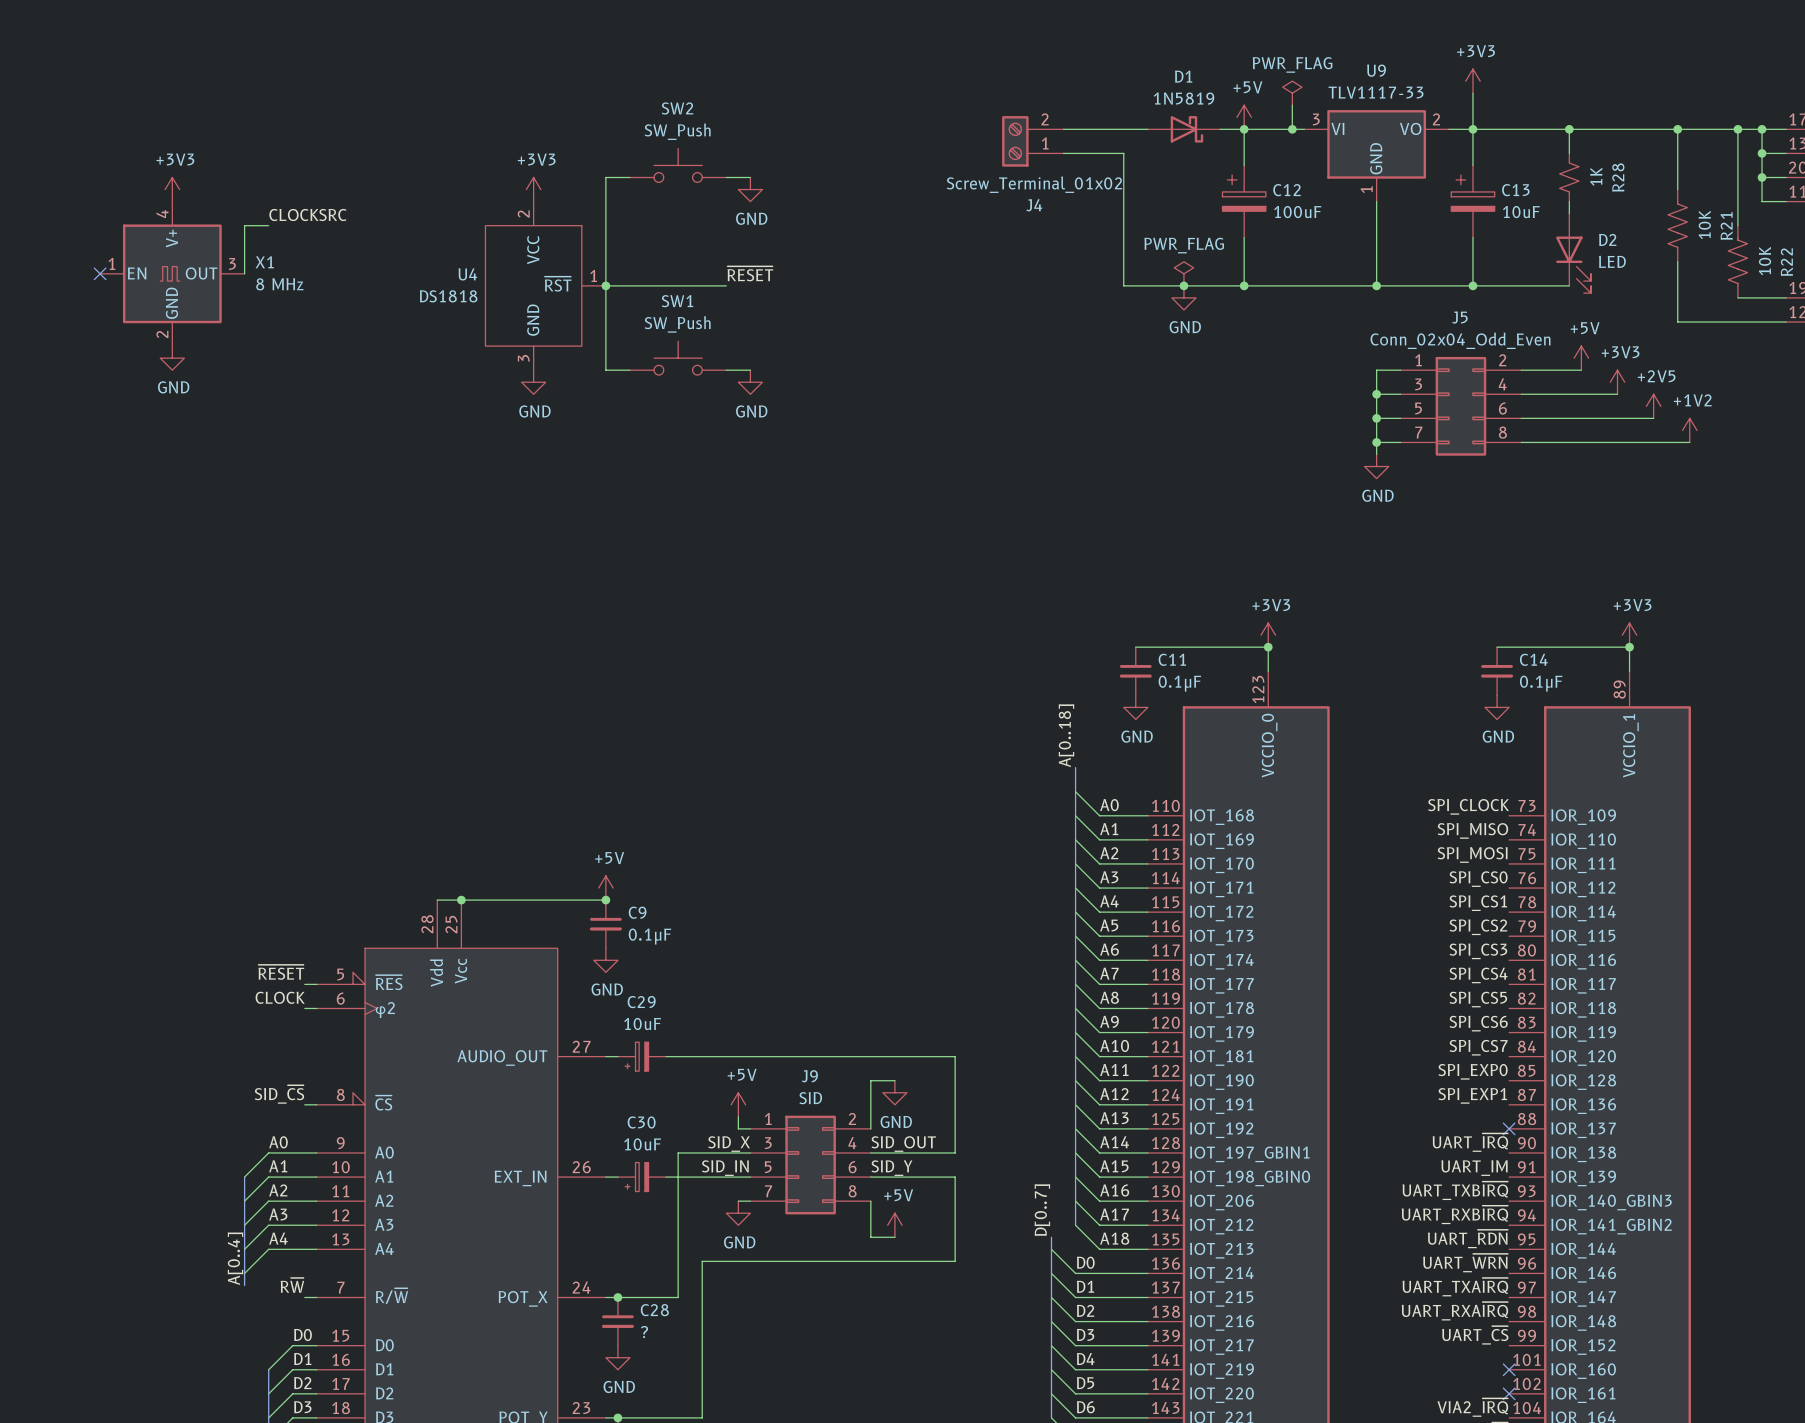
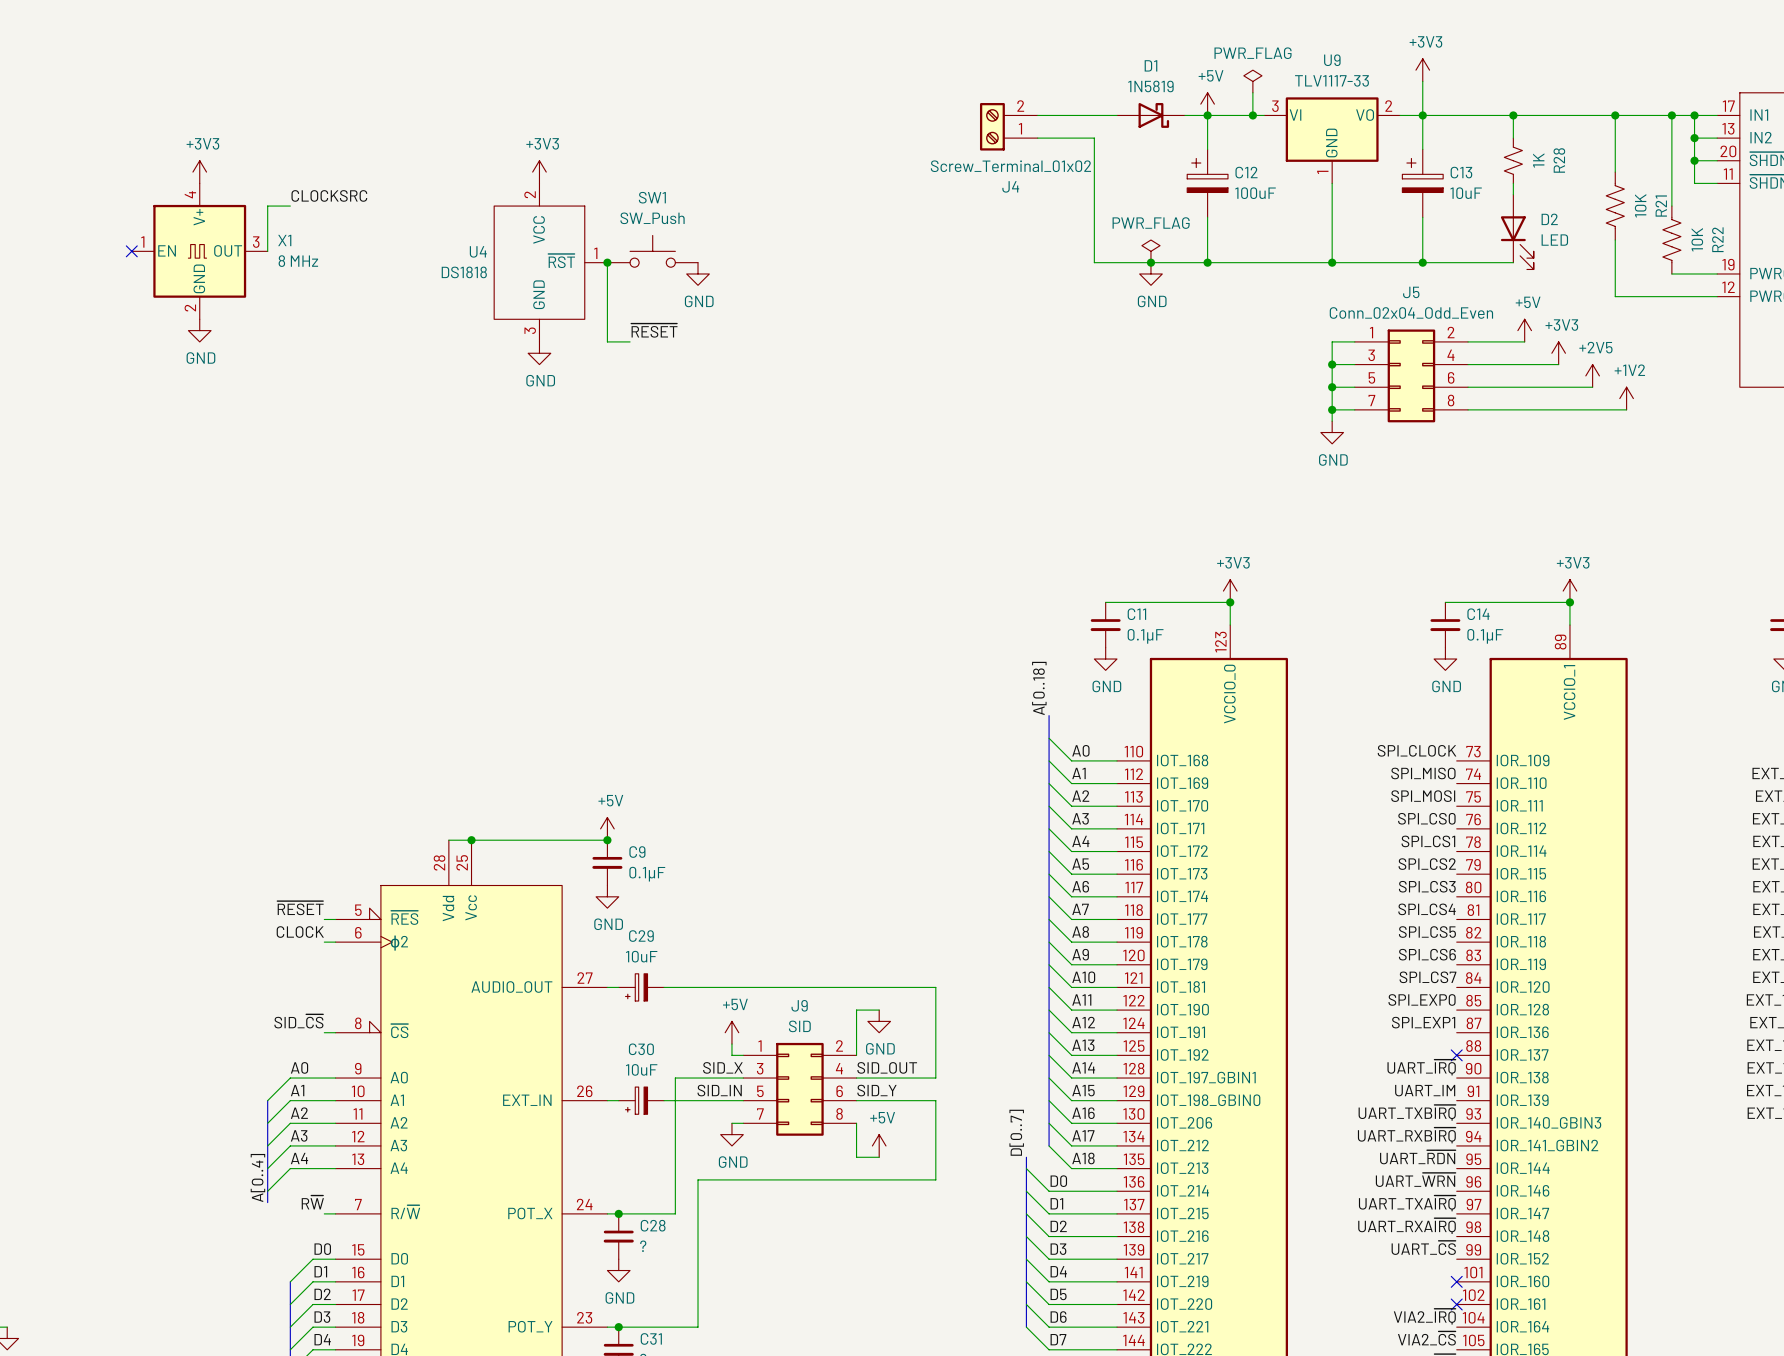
SW2: SW_Push (678, 165) -> none
wire: (629, 177) (605, 177) (605, 285) (726, 285) -> none
wire: (726, 177) (750, 177) -> none
power symbol: GND (750, 189) -> none
label position: ~{RESET} (750, 273) -> ~{RESET} (654, 330)
power symbol: none -> GND (698, 273)
SW1 position: (678, 358) -> (652, 251)
wire: (726, 370) (750, 370) -> none
power symbol: GND (750, 382) -> none

